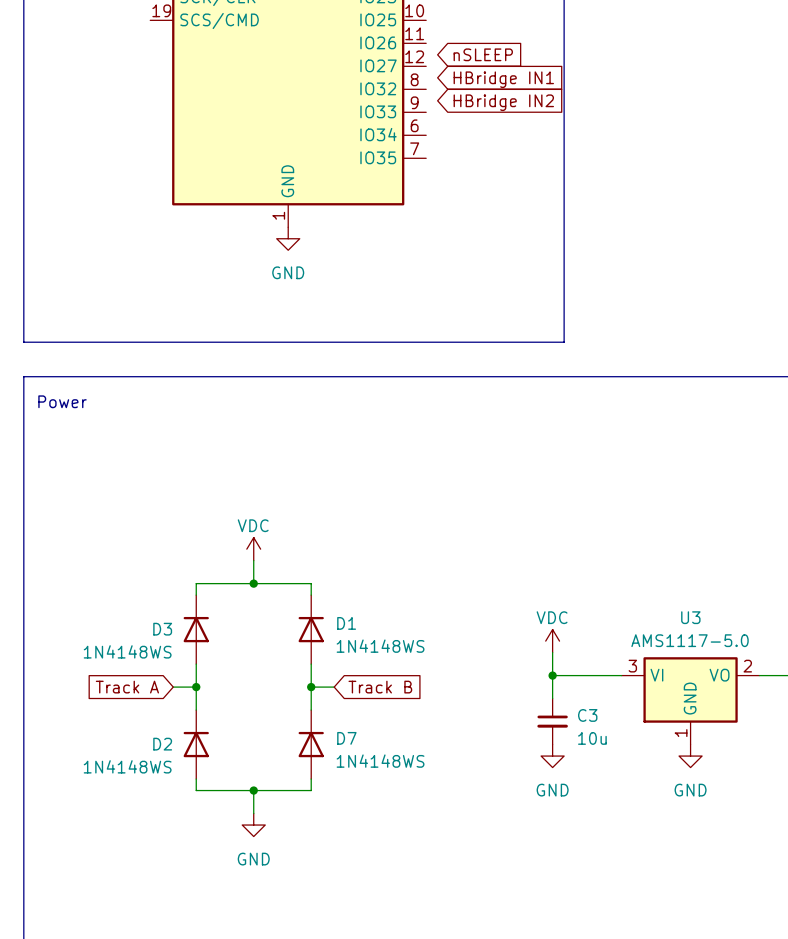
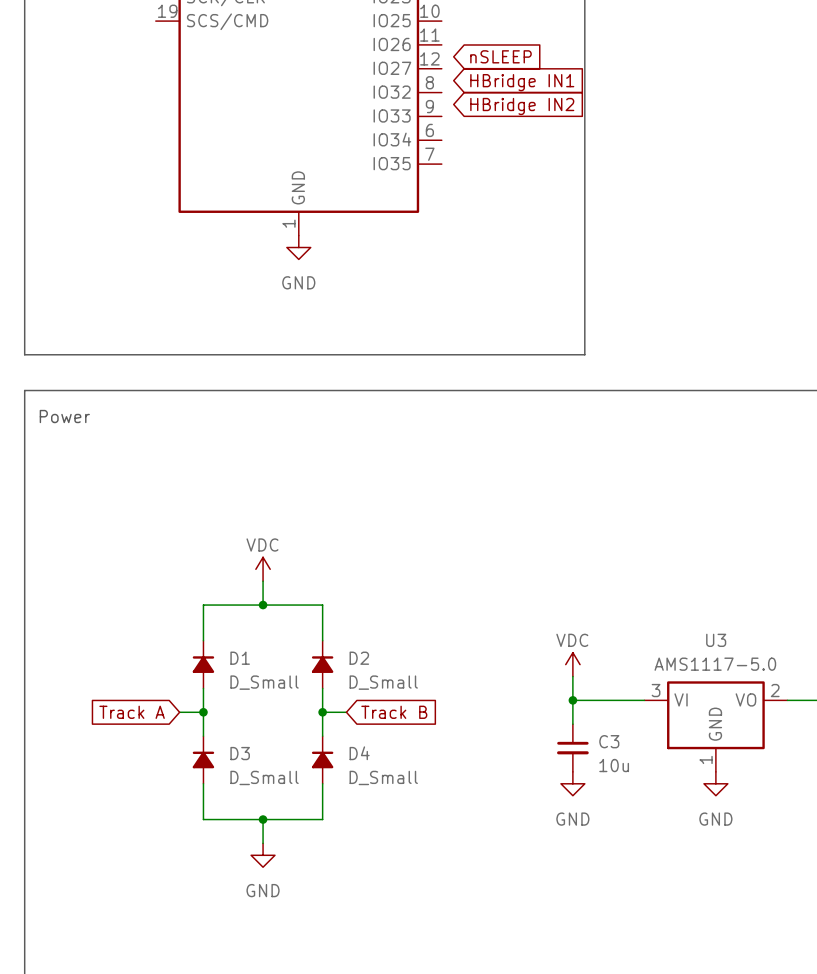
D3 symbol: [183, 595, 209, 665] -> [192, 736, 215, 784]
D1 symbol: [298, 595, 324, 665] -> [192, 640, 215, 689]
D3 name position: D3 (162, 629) -> D3 (240, 753)
D1 value: 1N4148WS (380, 646) -> D_Small (264, 682)
D3 value: 1N4148WS (127, 651) -> D_Small (264, 777)
D2 symbol: [183, 710, 209, 780] -> [311, 640, 334, 689]
D4: none -> D_Small (322, 759)
D2 name position: D2 (162, 744) -> D2 (359, 658)
D7: 1N4148WS (311, 744) -> none
D2 value: 1N4148WS (127, 766) -> D_Small (383, 682)

